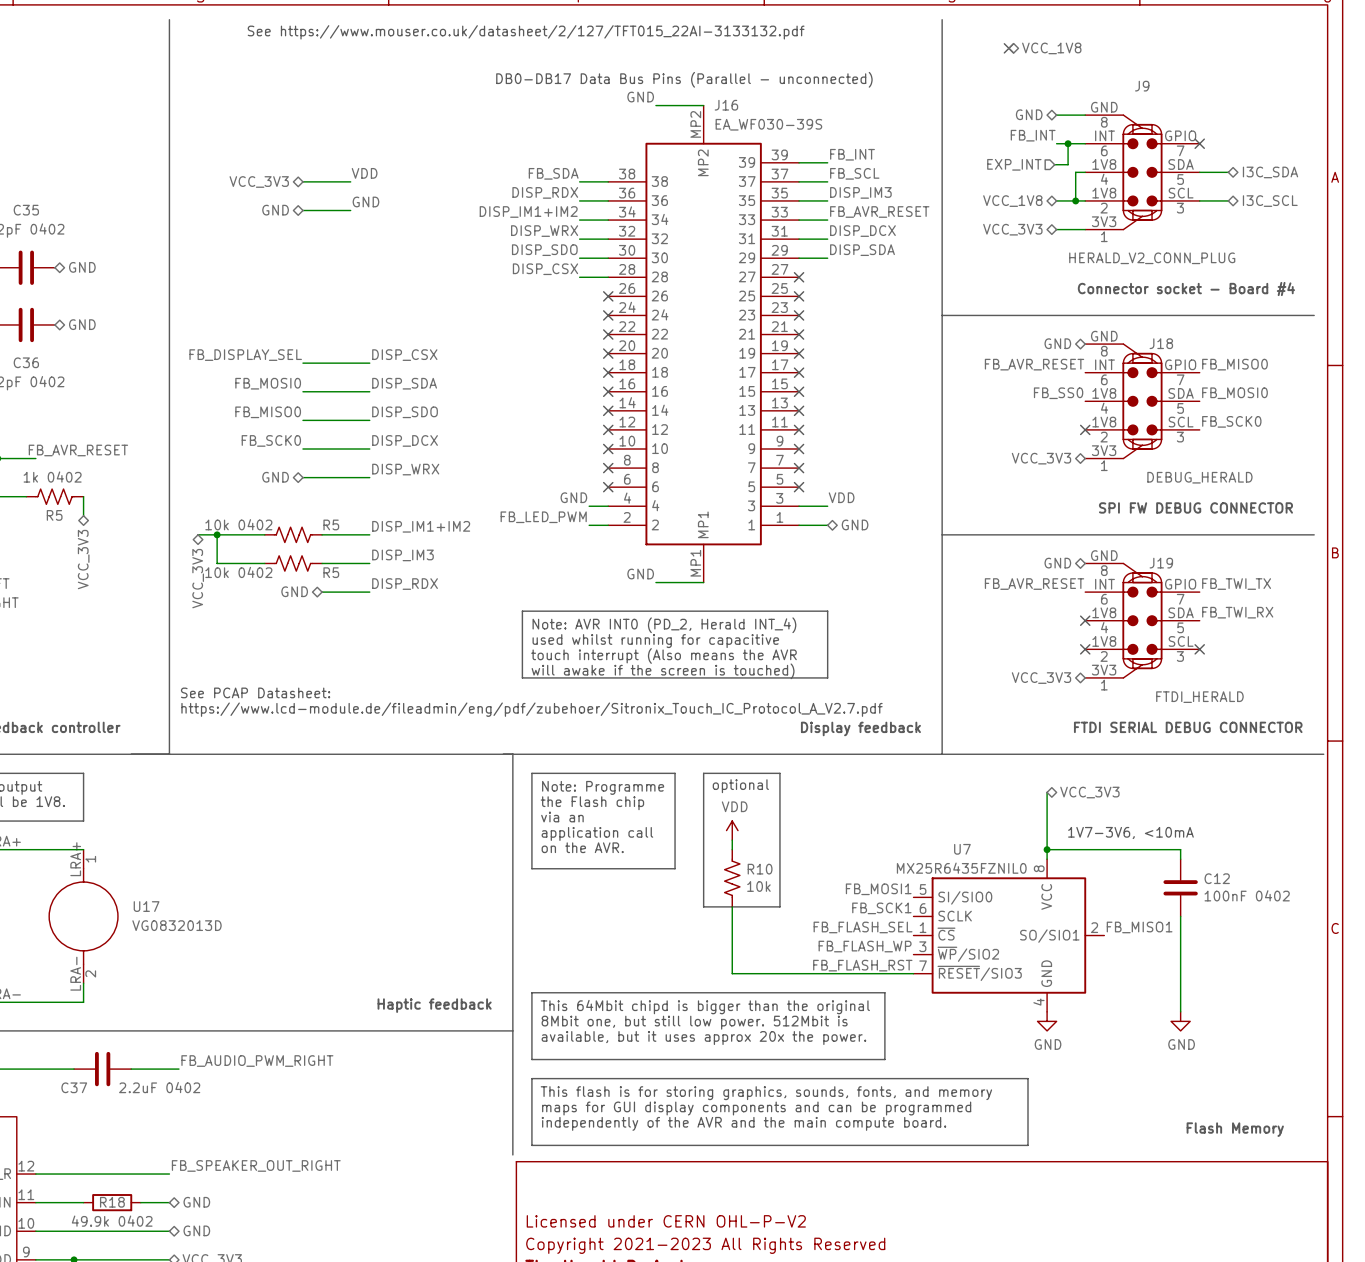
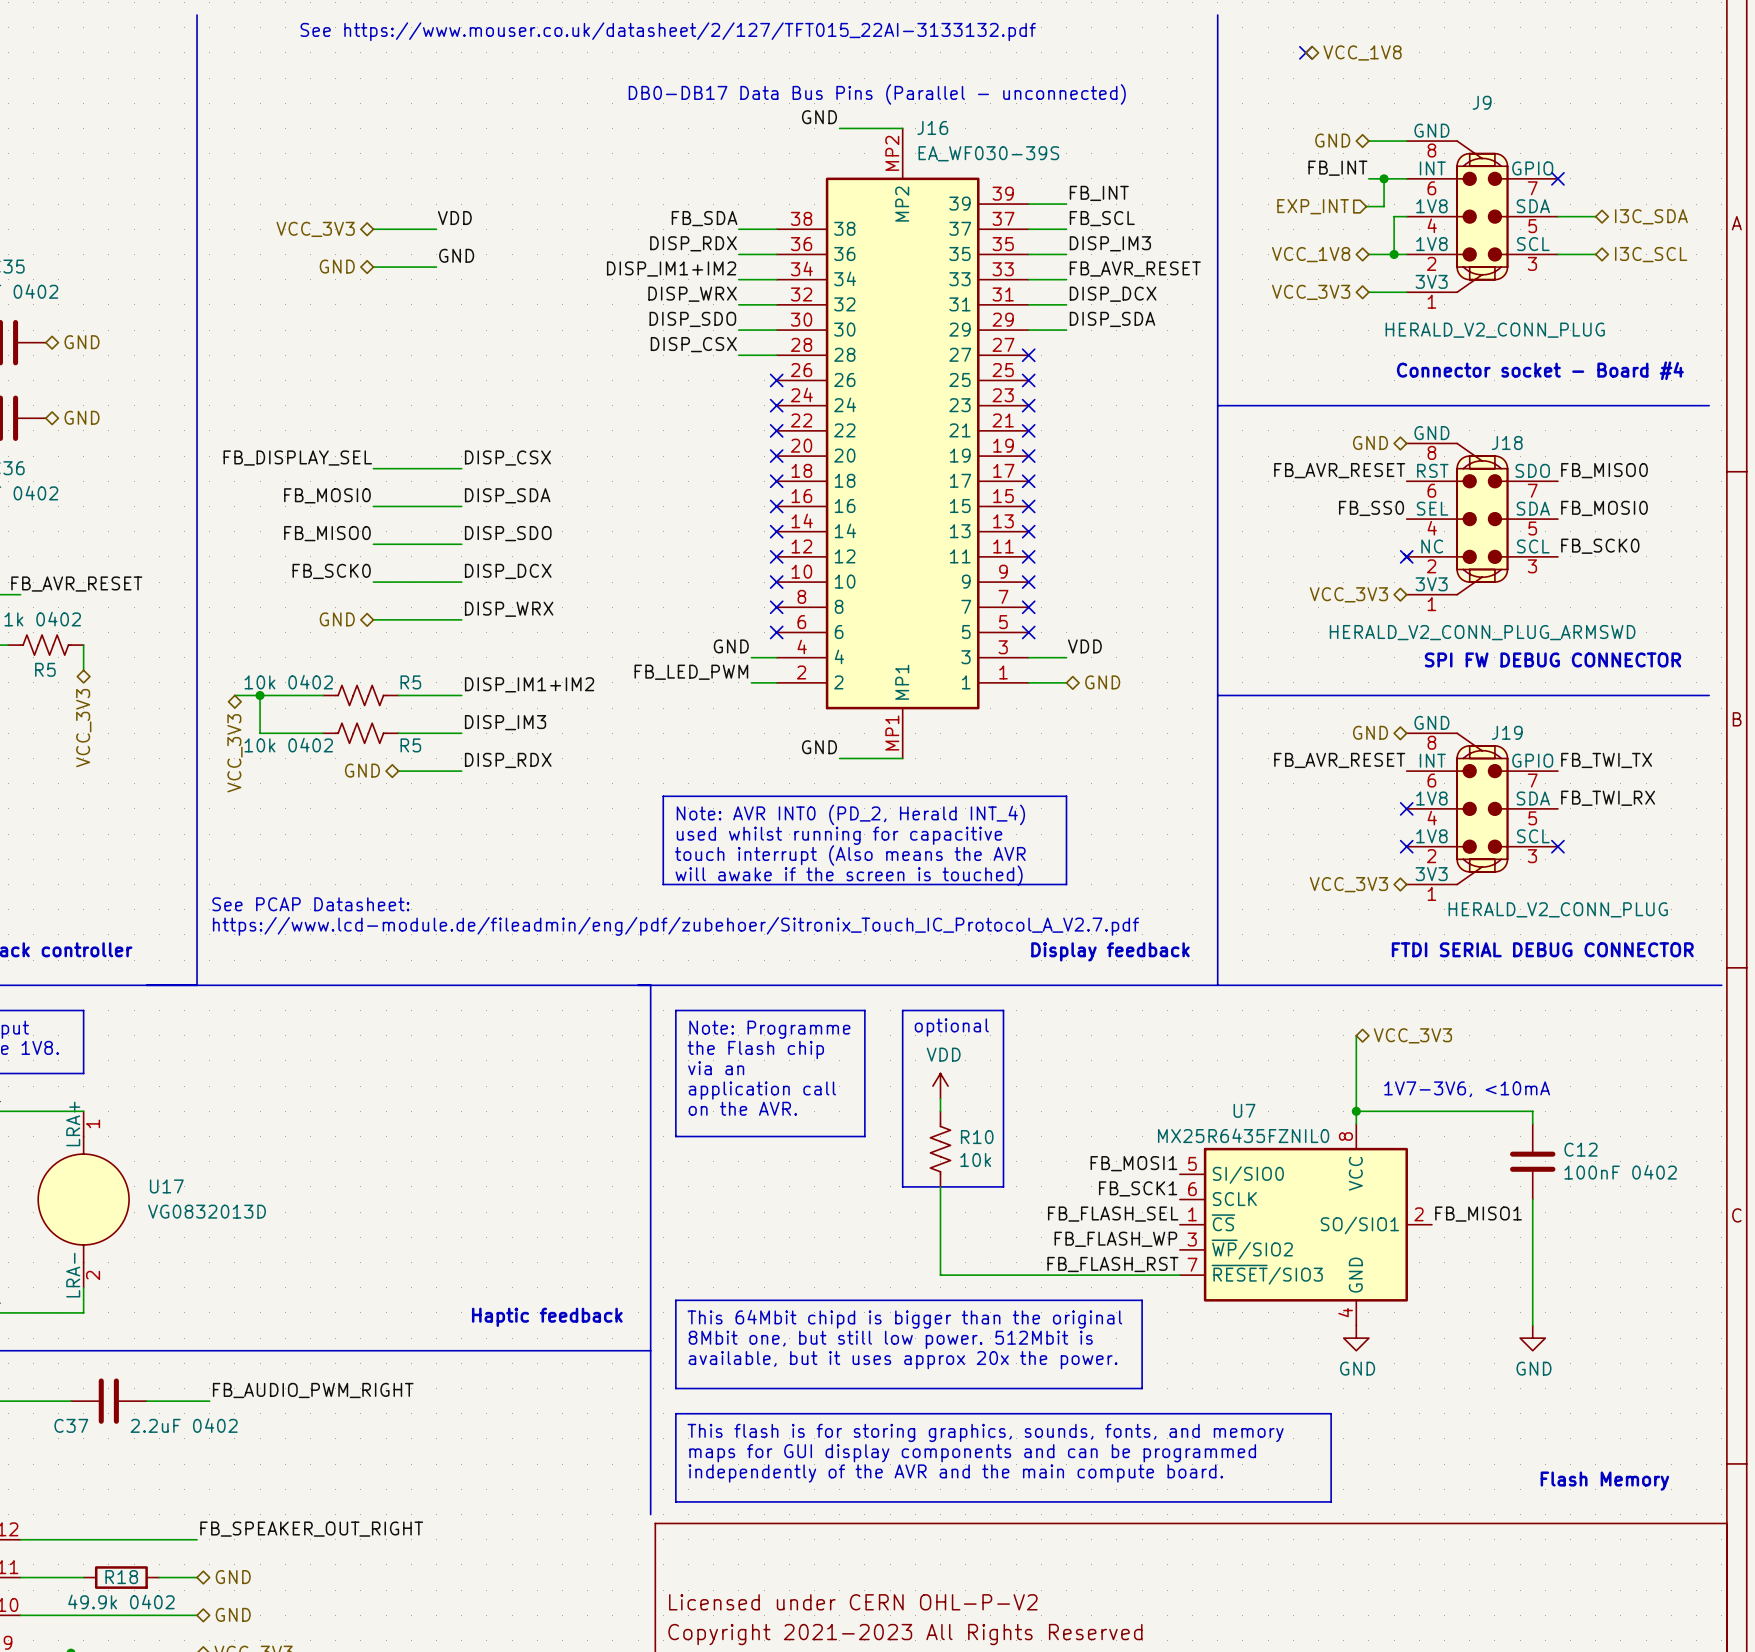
J18 symbol: [1085, 344, 1200, 459] -> [1403, 443, 1558, 595]
J18 value: DEBUG_HERALD (1199, 477) -> HERALD_V2_CONN_PLUG_ARMSWD (1482, 632)
J19 value: FTDI_HERALD (1199, 697) -> HERALD_V2_CONN_PLUG (1558, 909)

